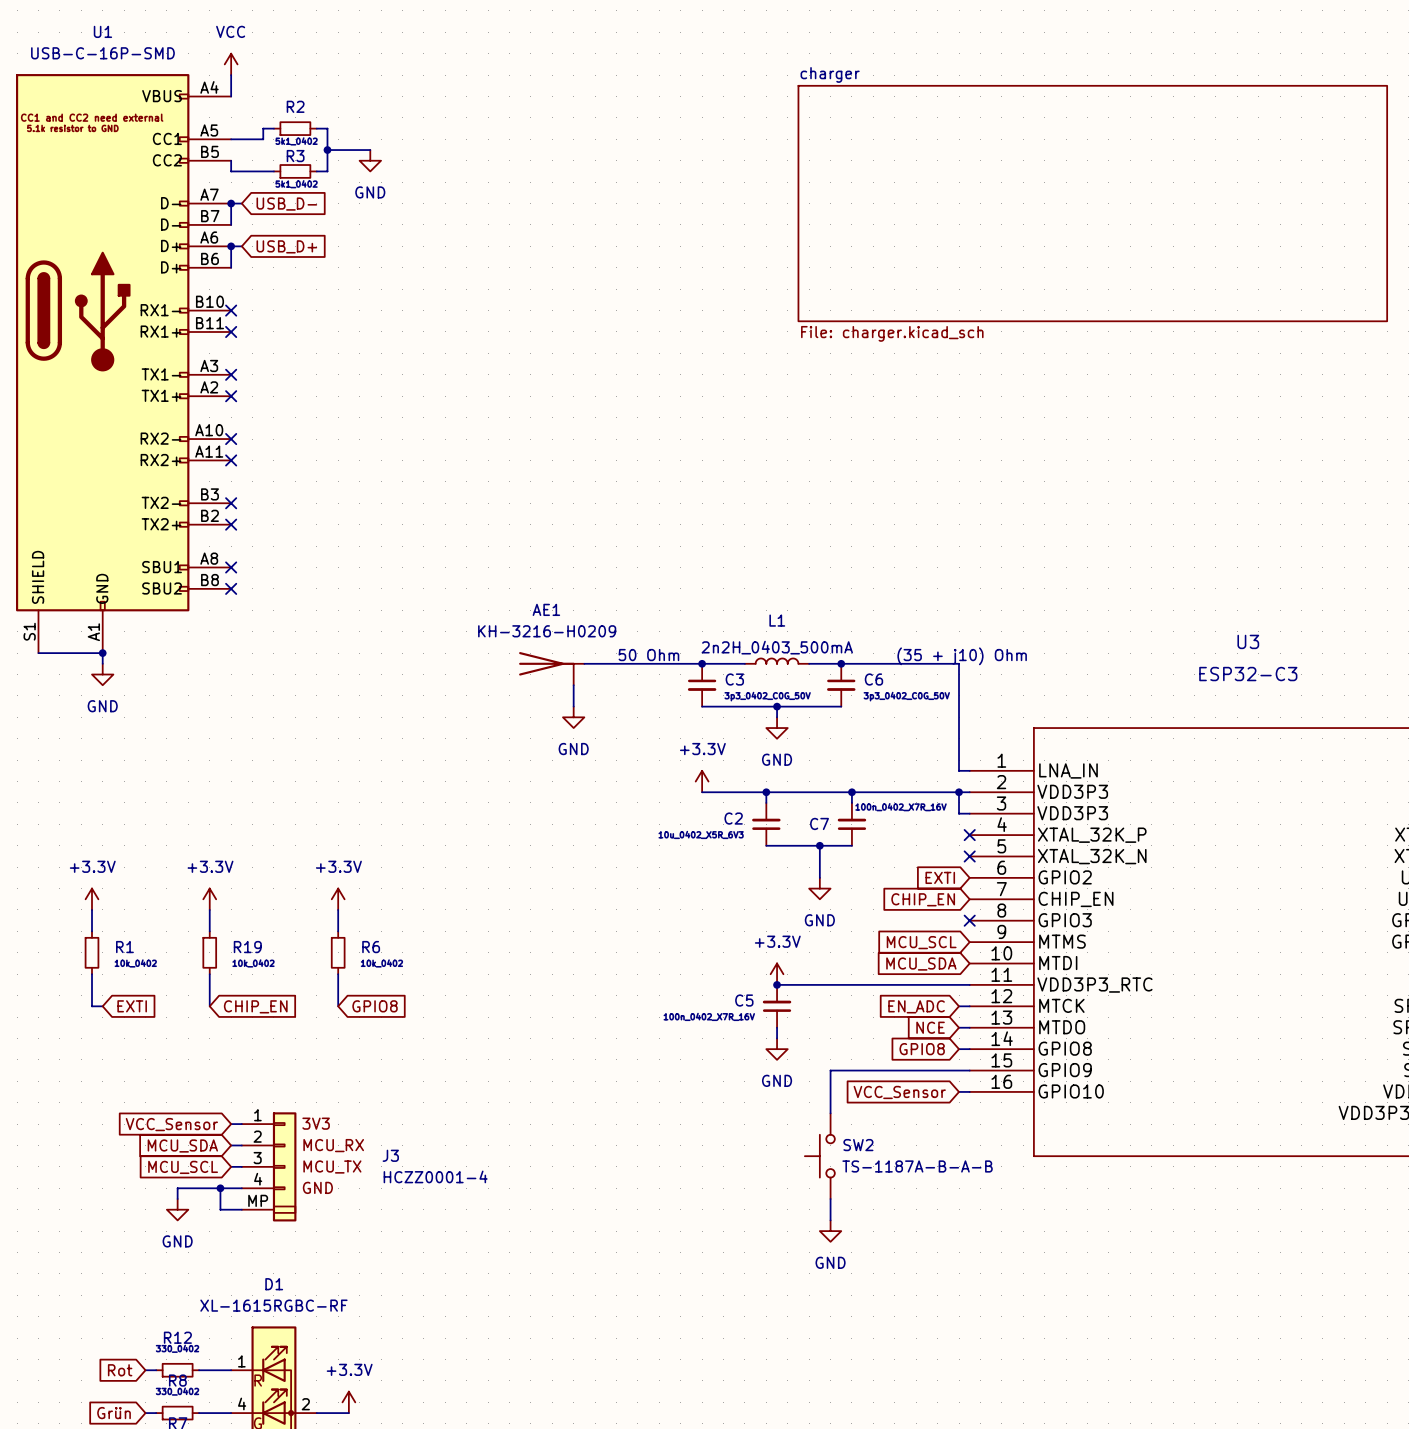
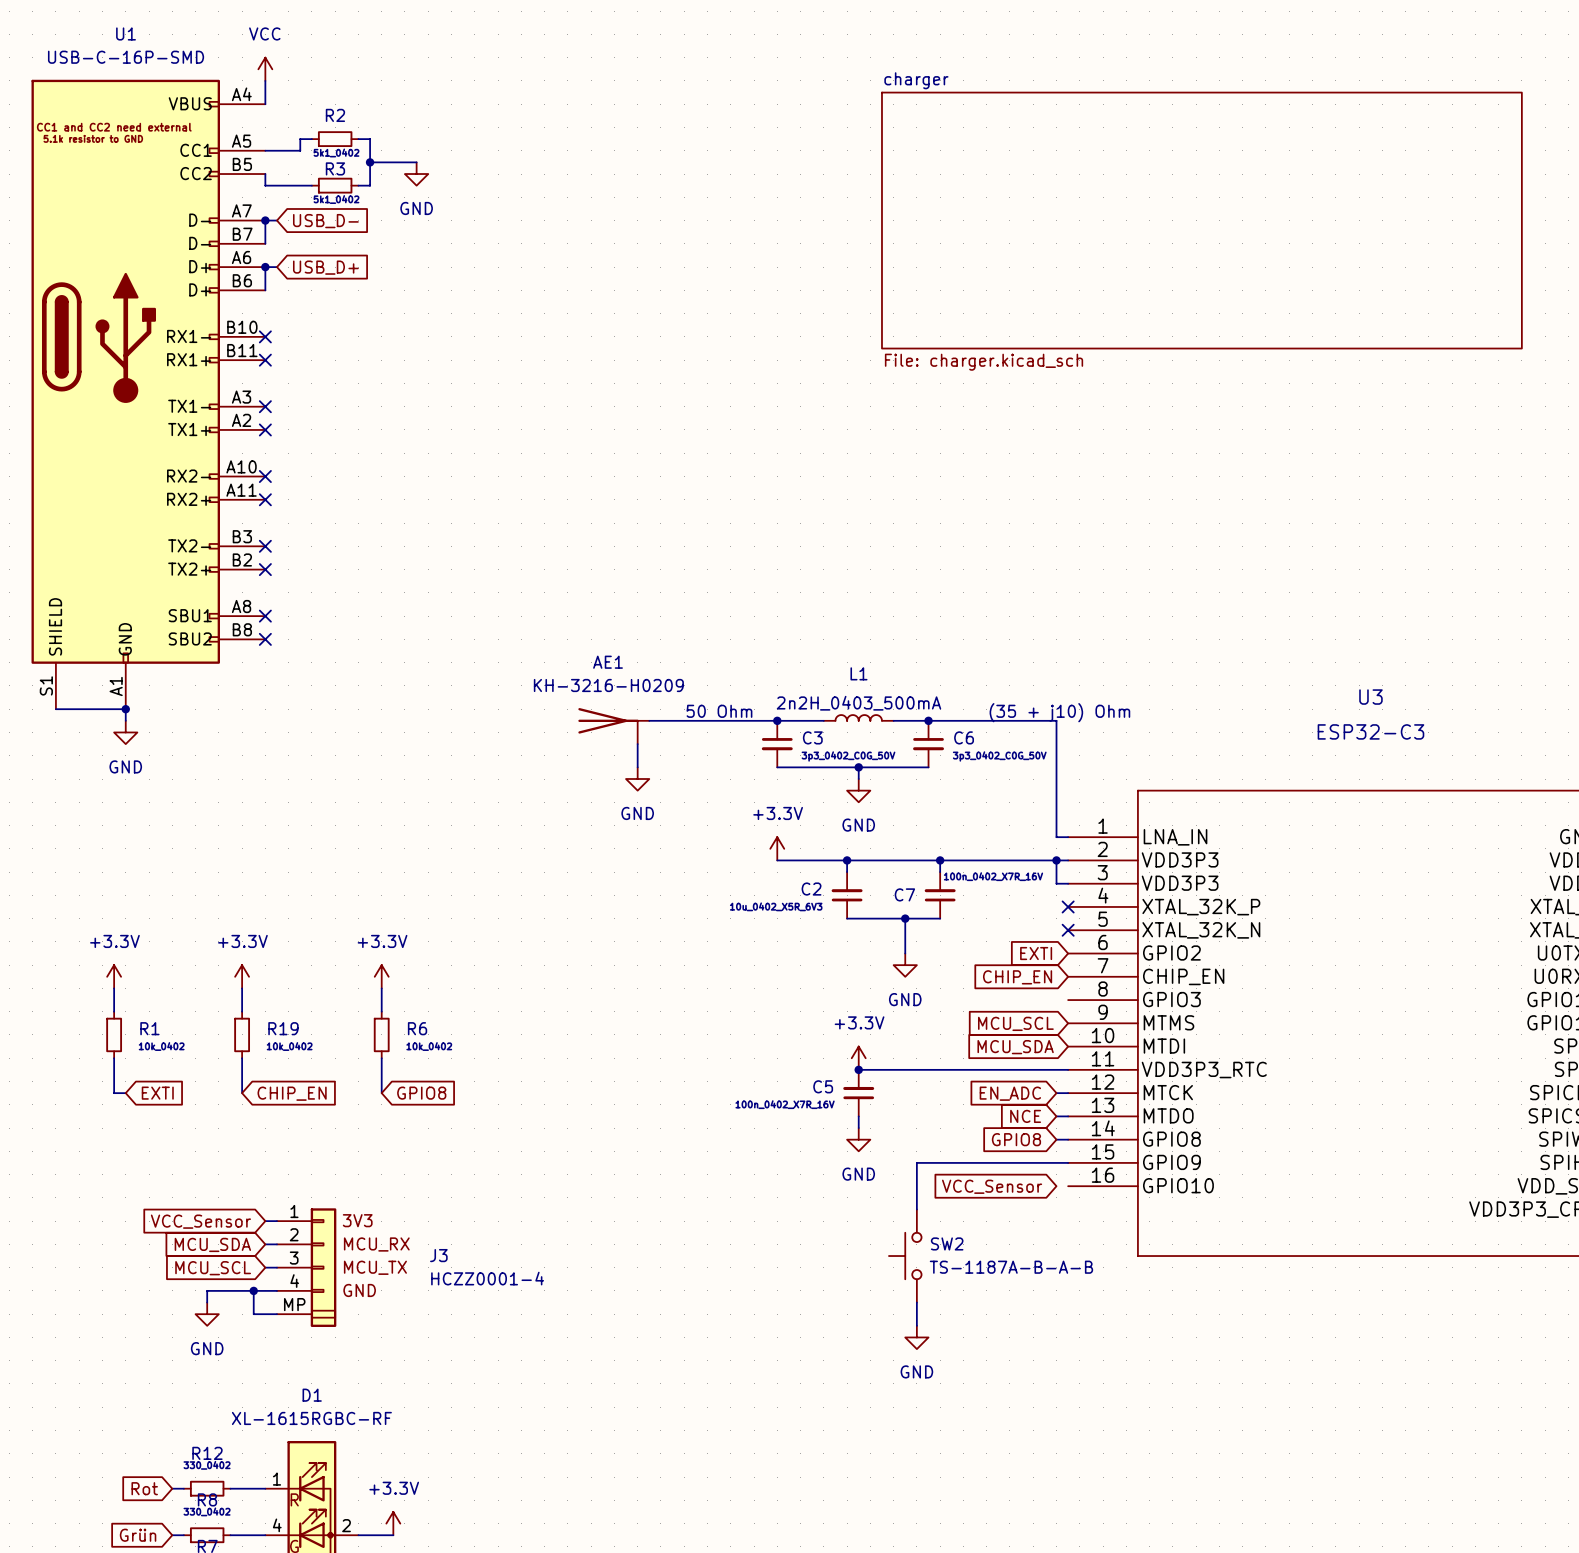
no-connect mark: (969, 920) -> none
wire: (959, 1091) (969, 1091) -> none

